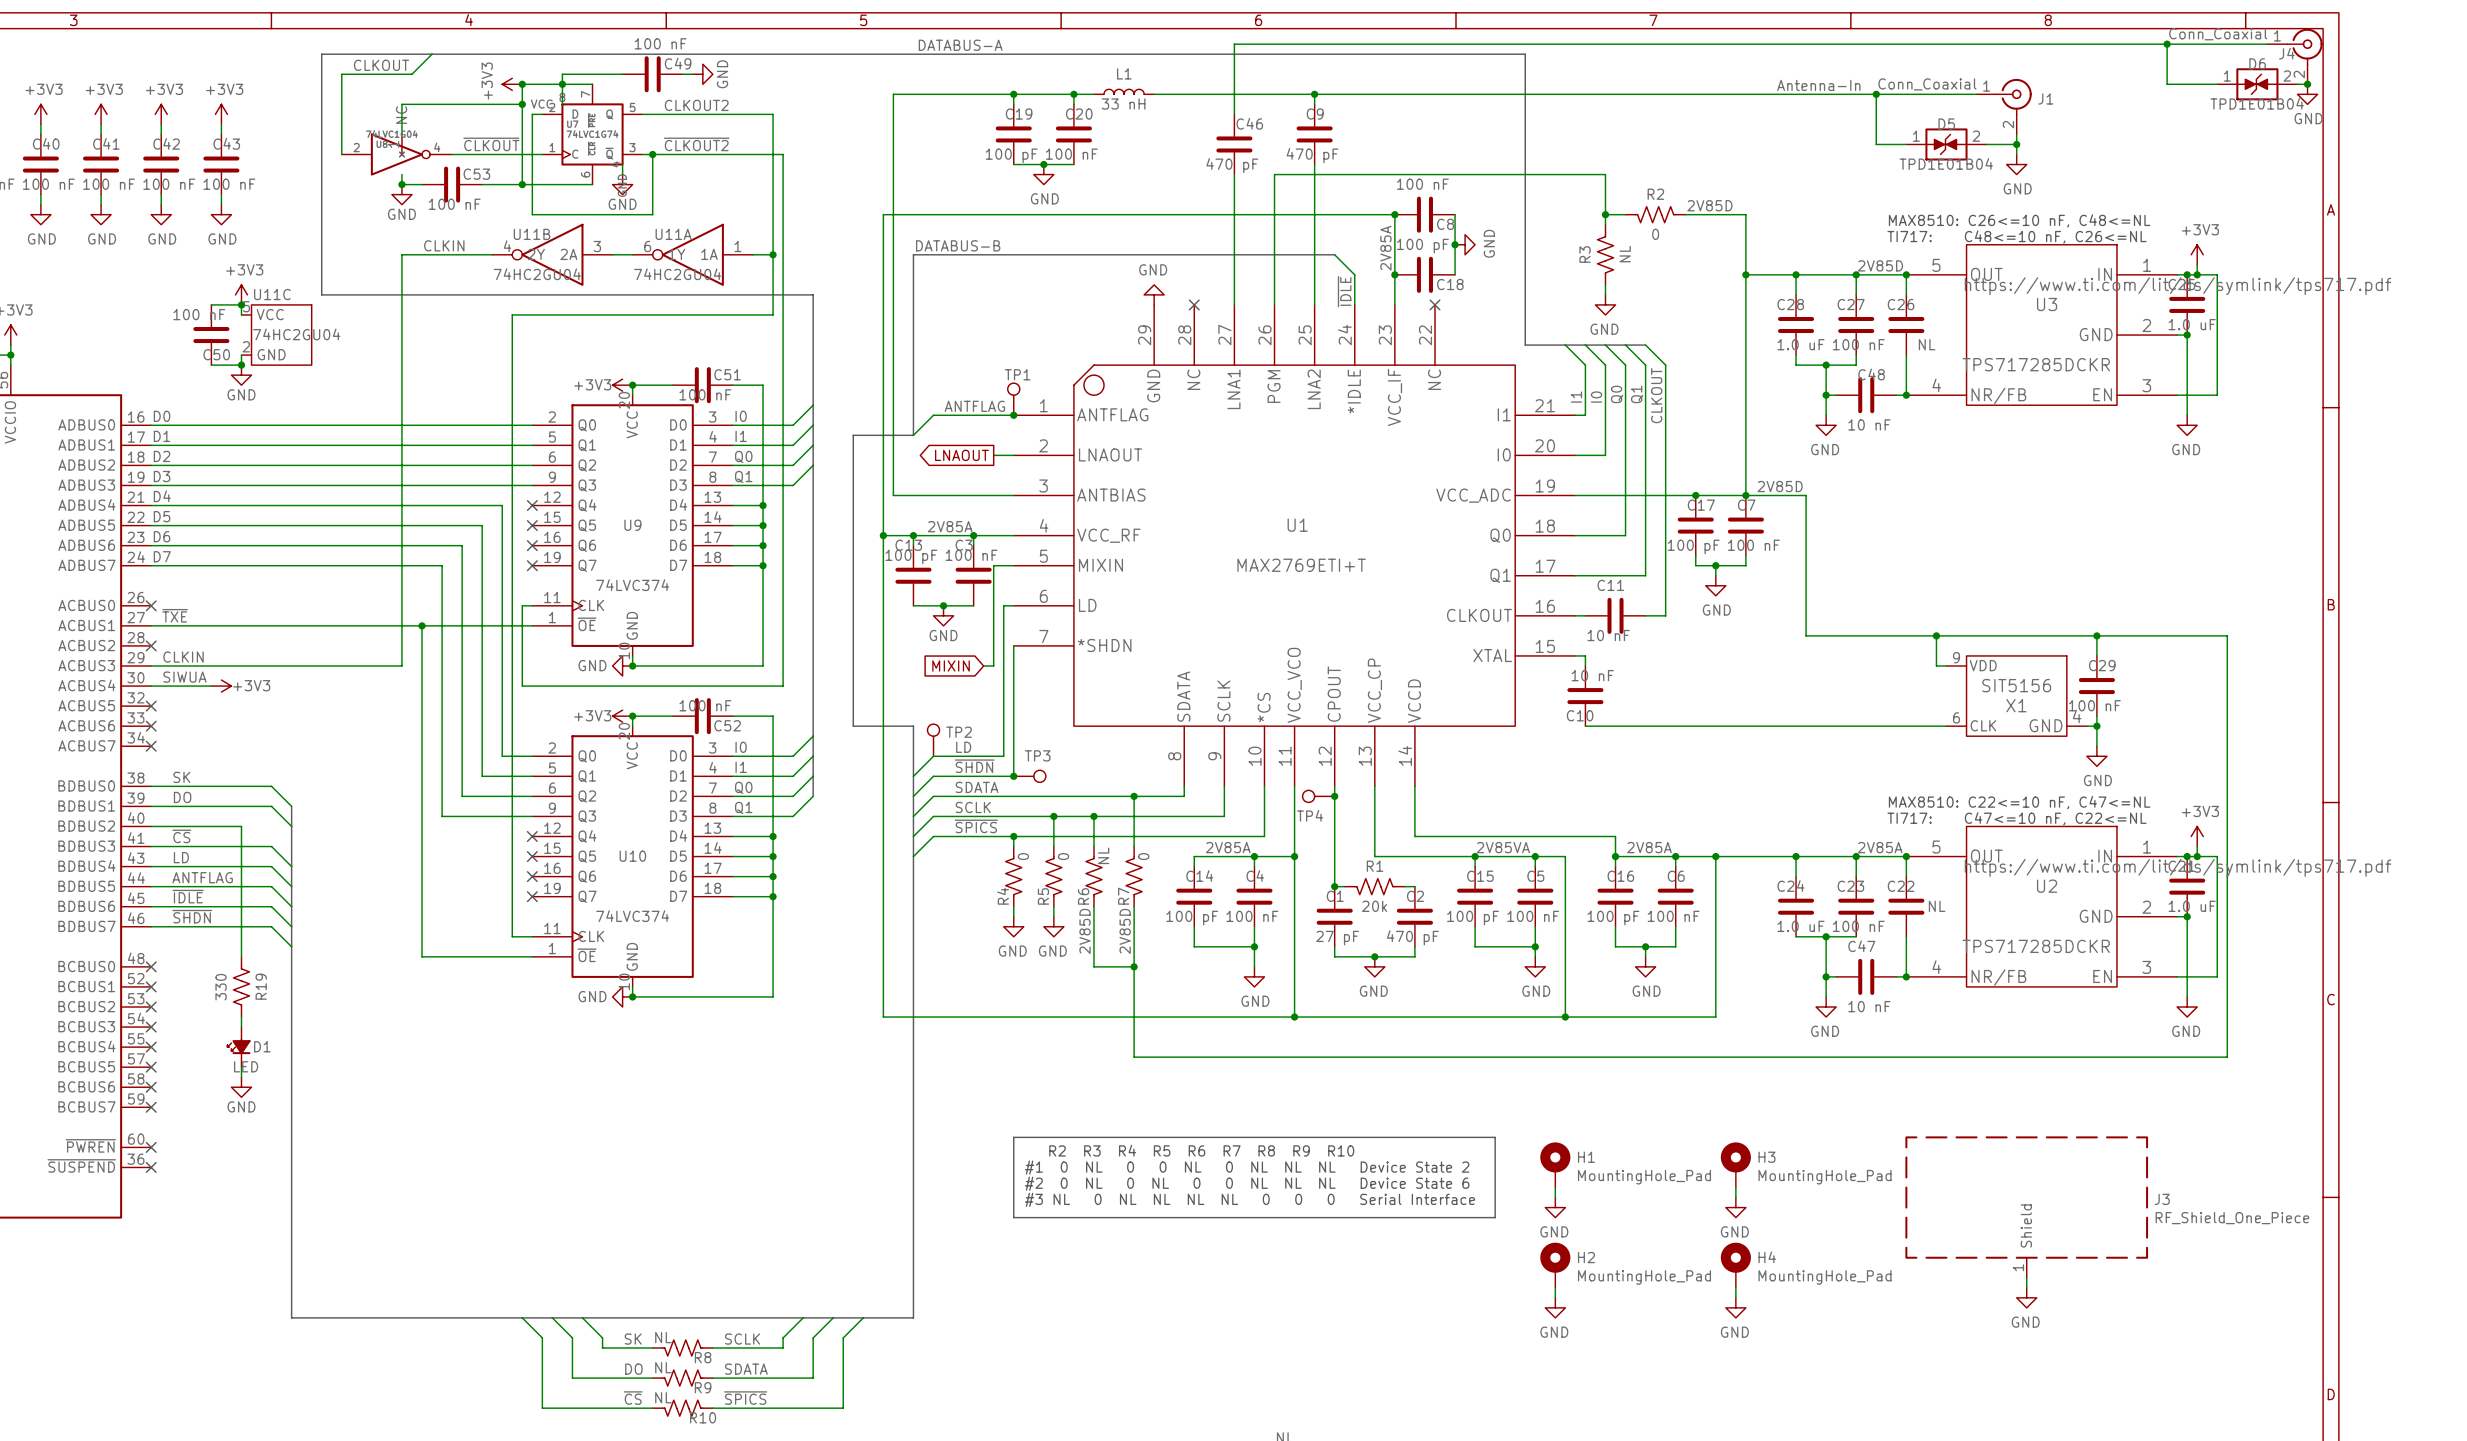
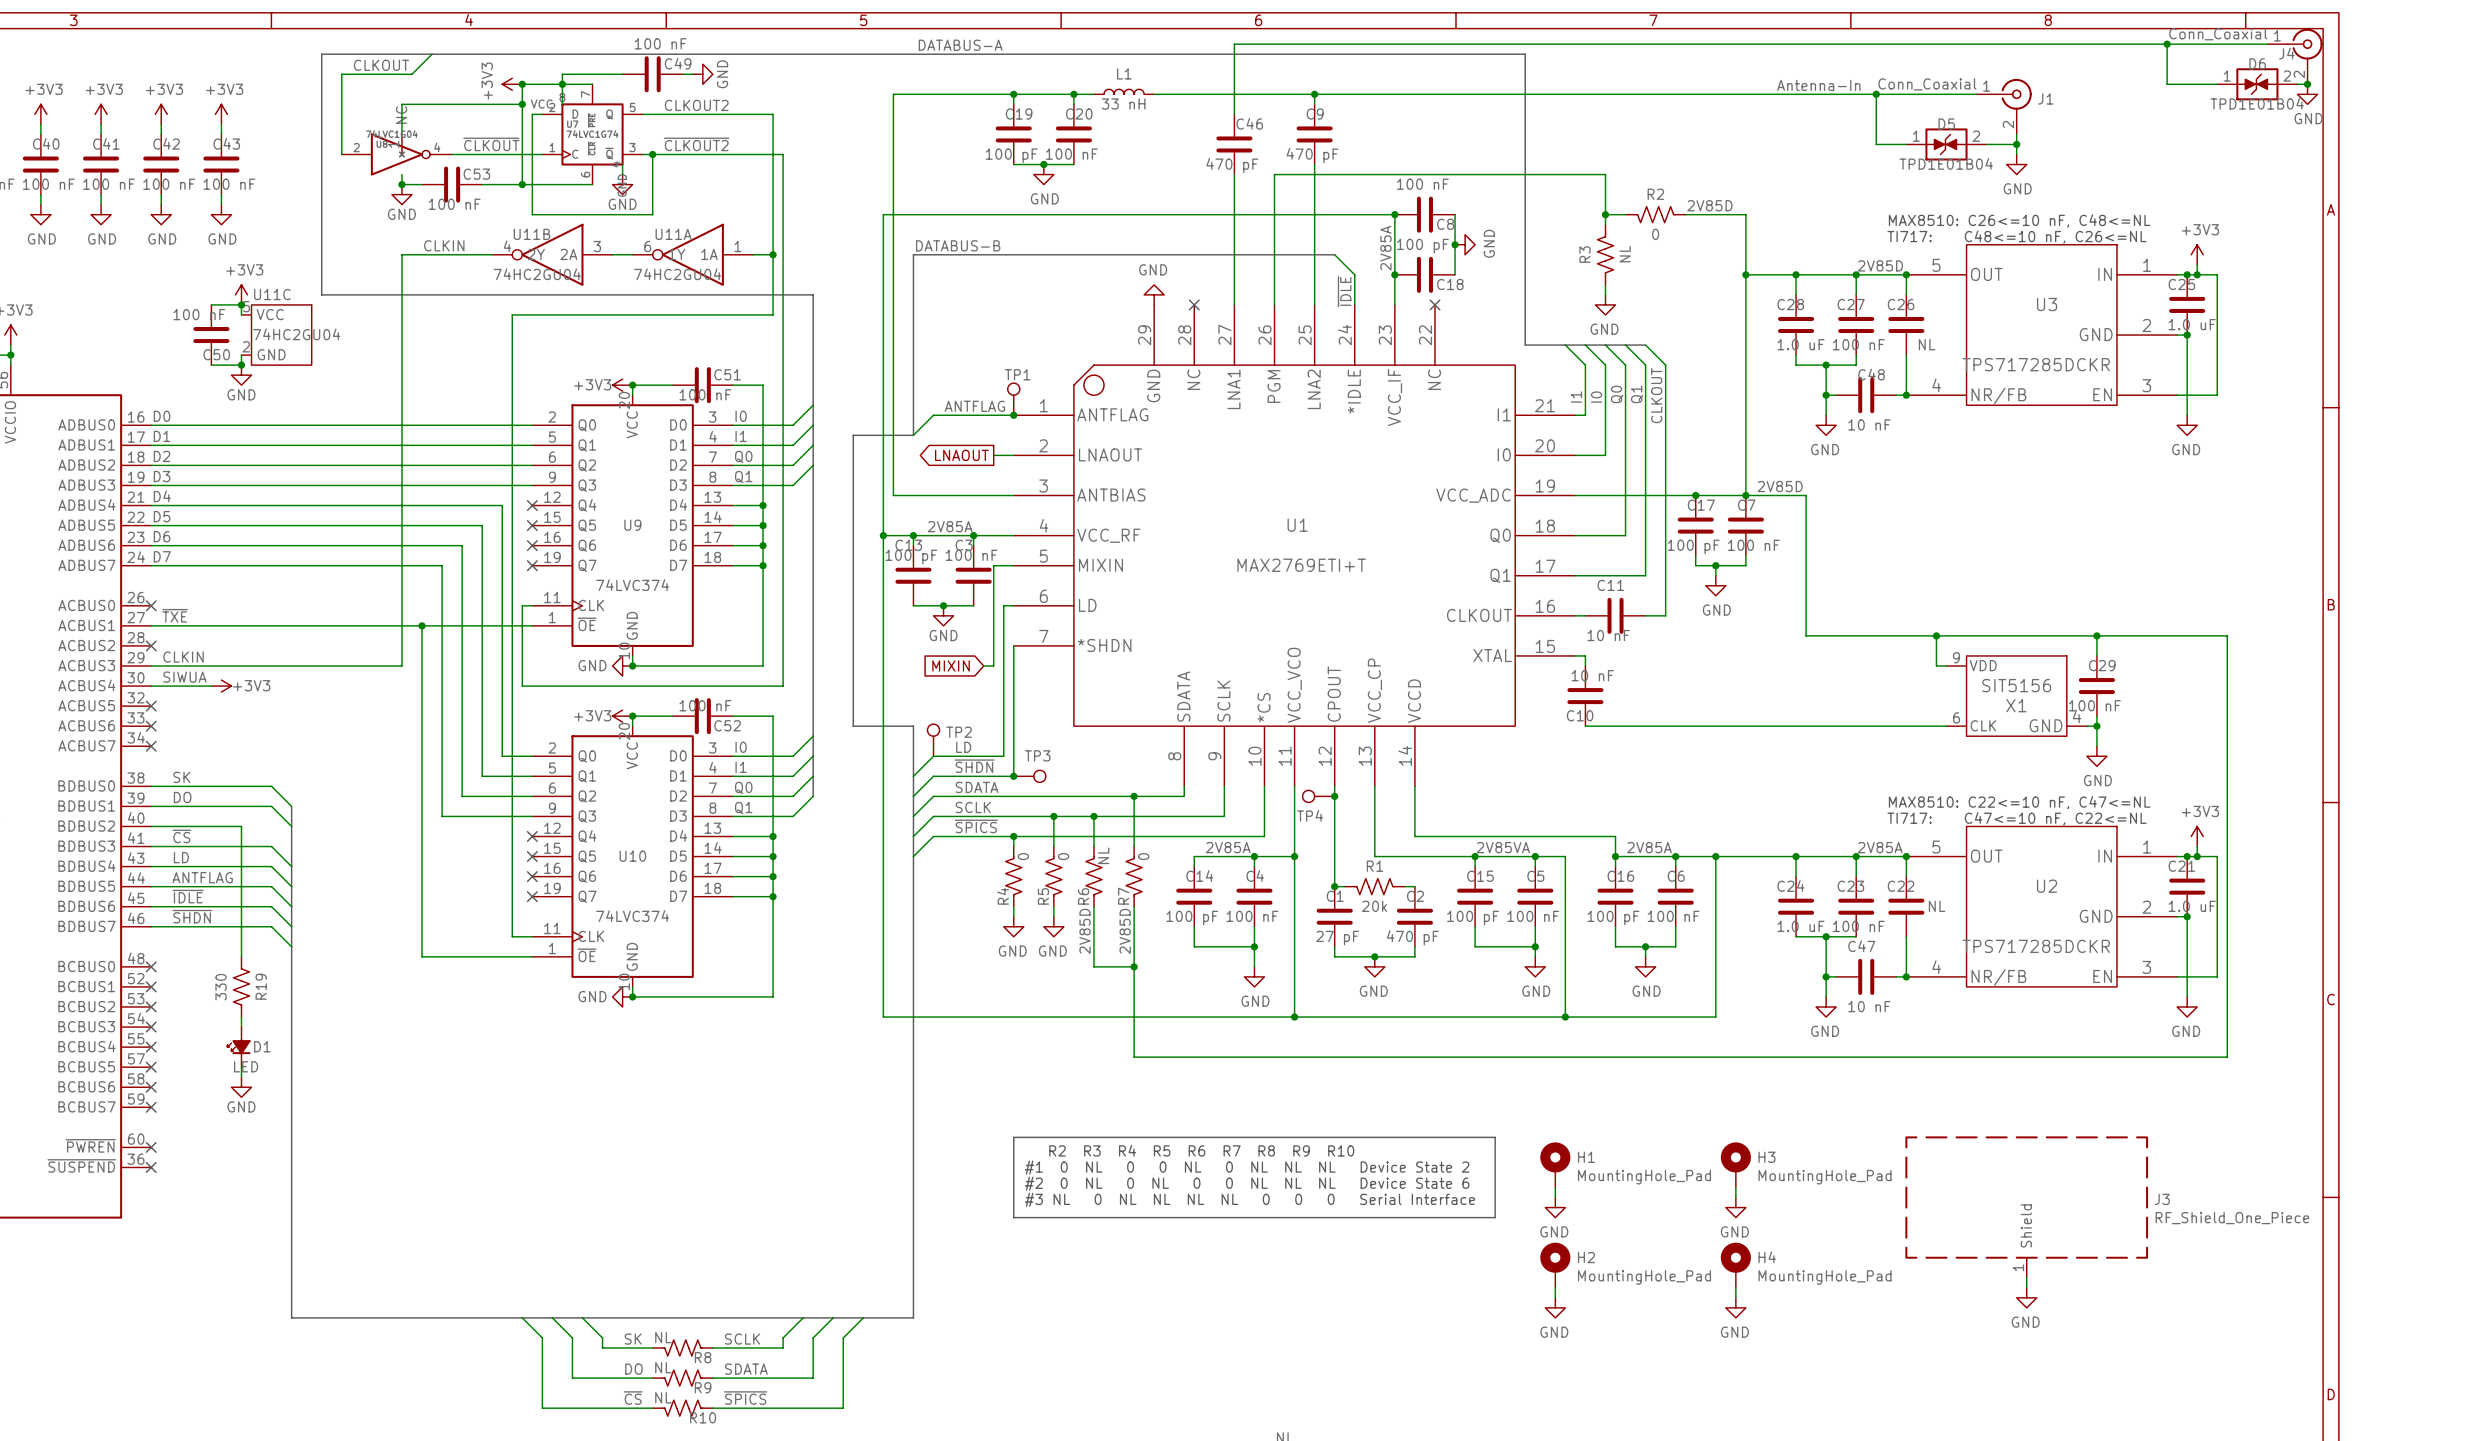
U3 text: https://www.ti.com/lit/ds/symlink/tps717.pdf (2178, 286) -> none
U2 text: https://www.ti.com/lit/ds/symlink/tps717.pdf (2178, 867) -> none

